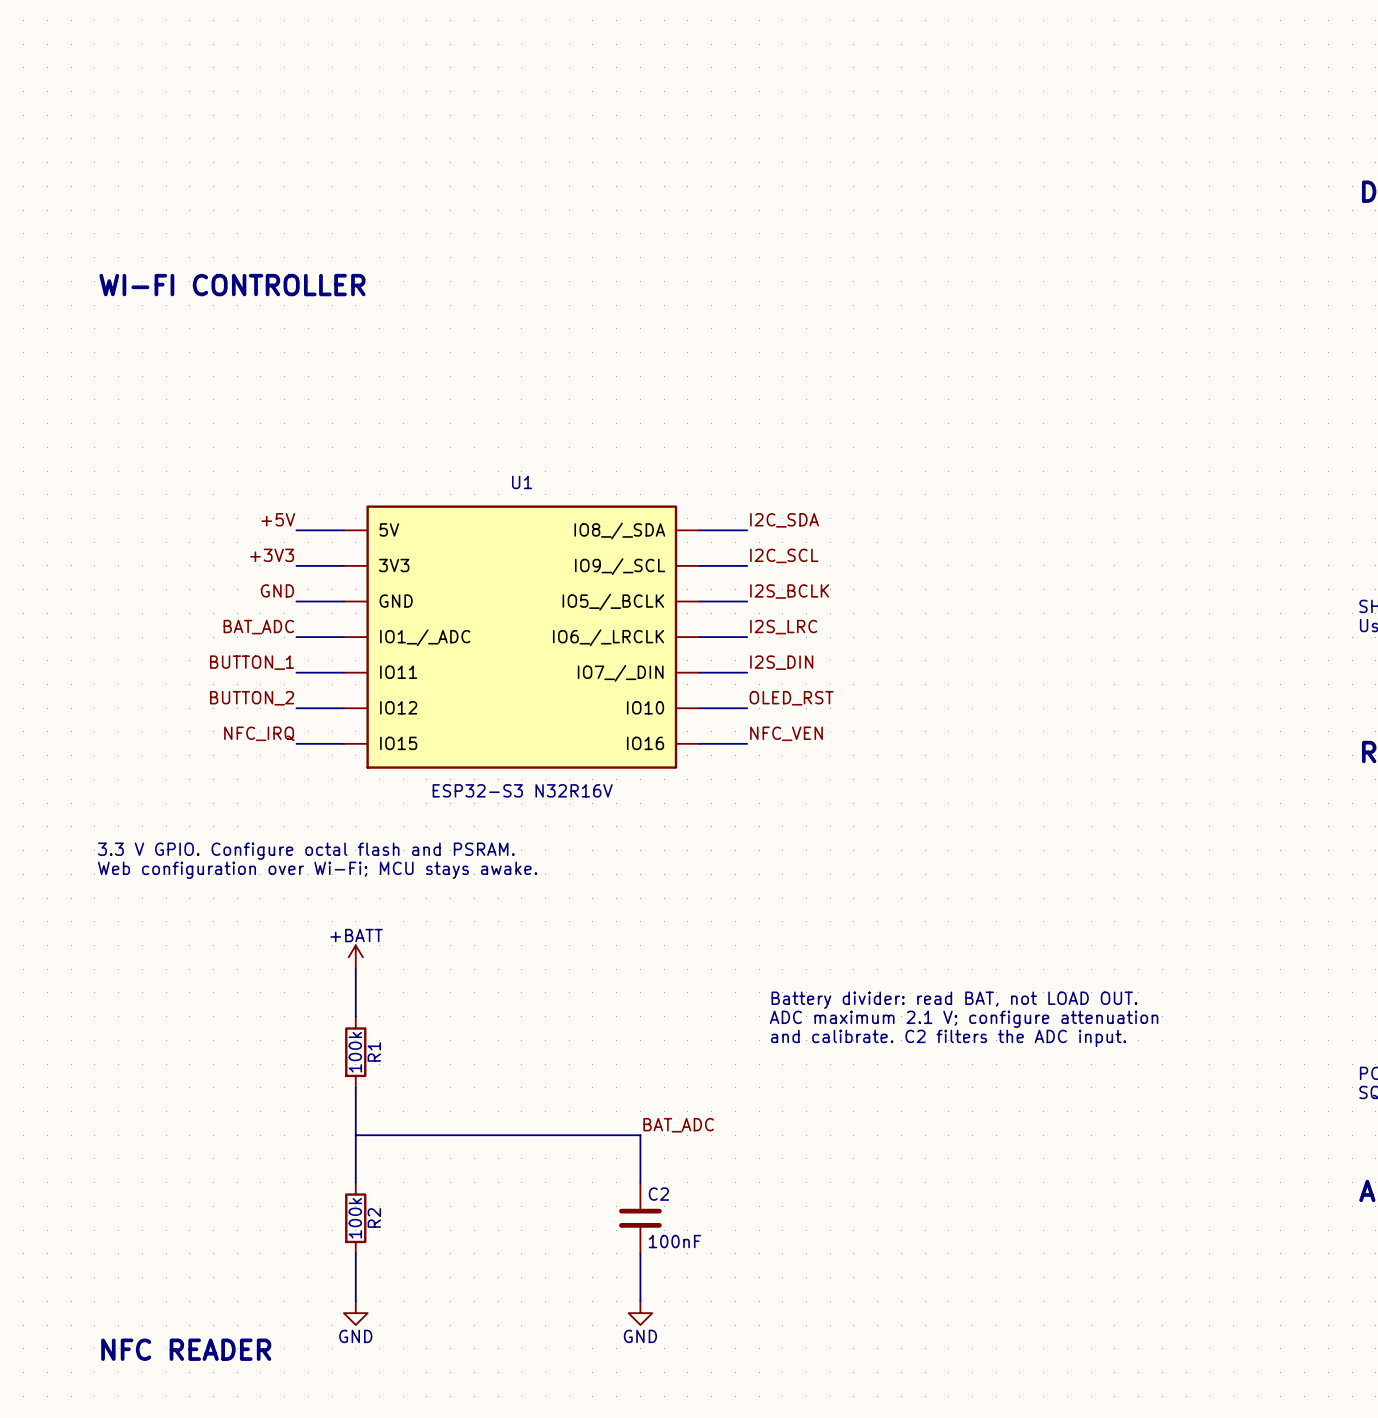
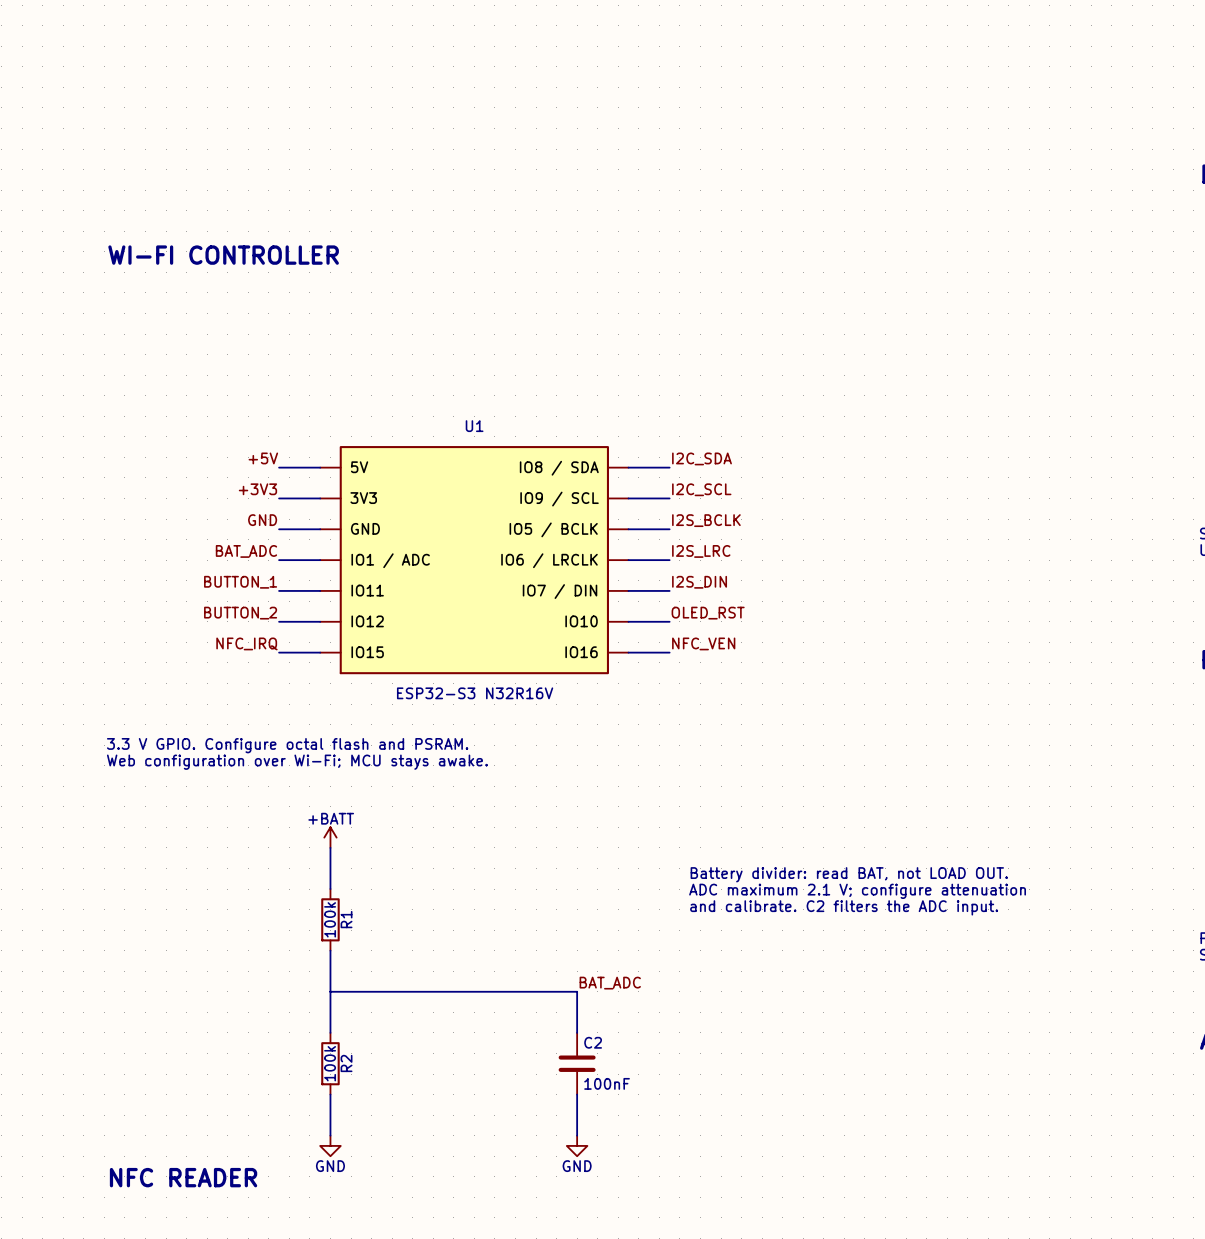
U1 pin name: IO8_/_SDA (619, 531) -> IO8 / SDA (559, 468)
U1 pin name: IO9_/_SCL (620, 566) -> IO9 / SCL (559, 499)
U1 pin name: IO5_/_BCLK (613, 602) -> IO5 / BCLK (553, 529)
U1 pin name: IO1_/_ADC (425, 637) -> IO1 / ADC (390, 560)
U1 pin name: IO6_/_LRCLK (608, 637) -> IO6 / LRCLK (549, 560)
U1 pin name: IO7_/_DIN (620, 673) -> IO7 / DIN (560, 591)

